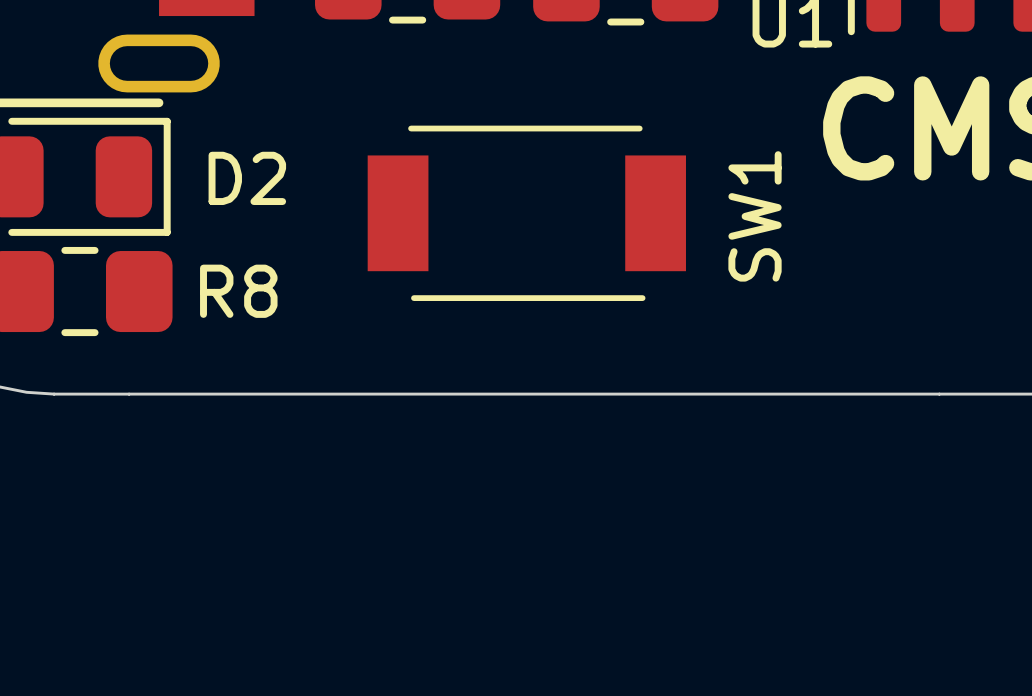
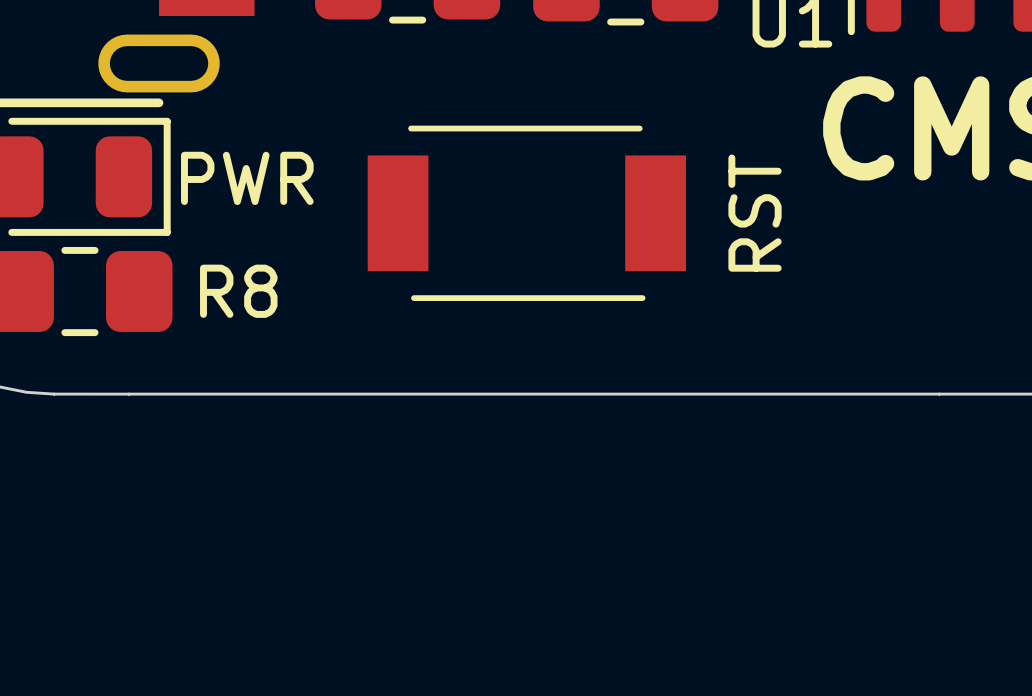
D2 name: D2 (247, 178) -> PWR (247, 178)
SW1 name: SW1 (755, 216) -> RST (755, 213)

